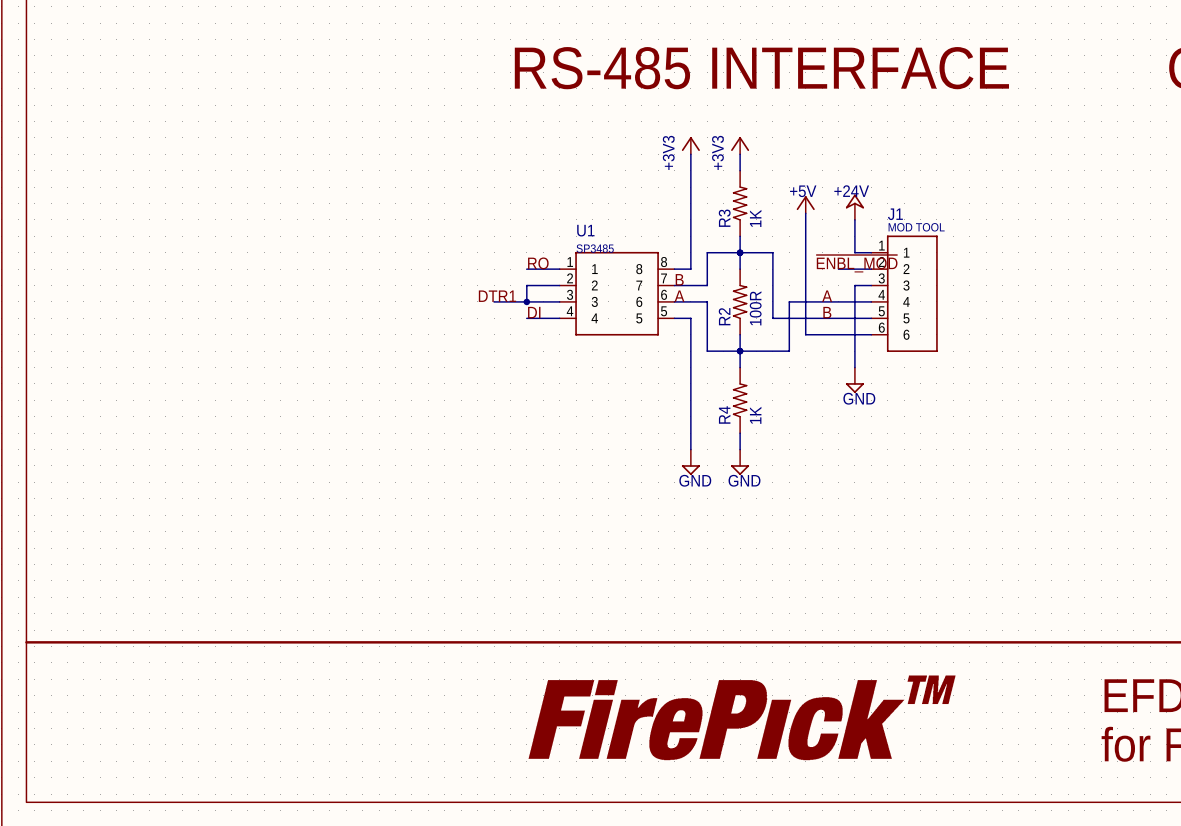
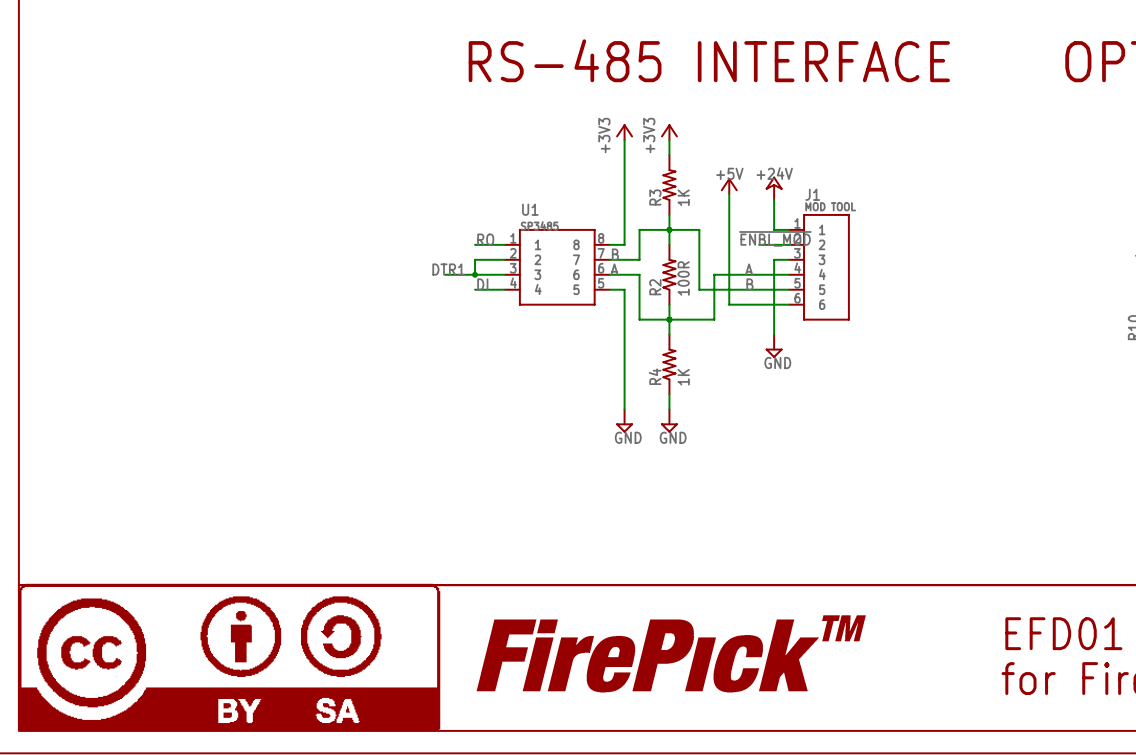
part: none -> (229, 657)

